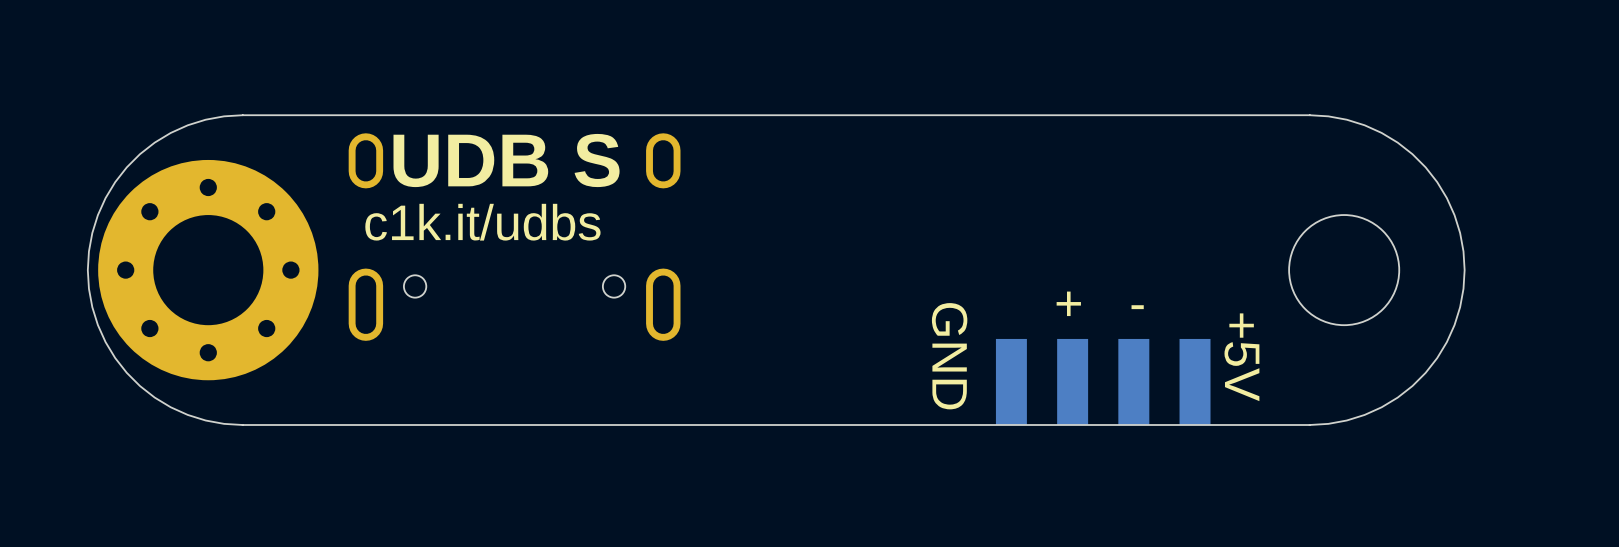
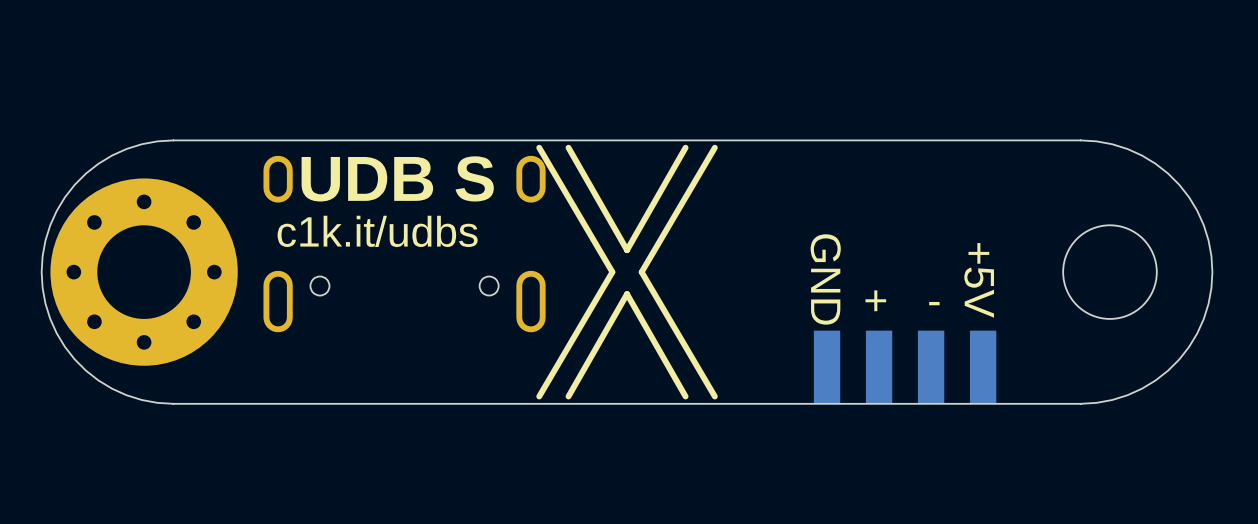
line: none -> (539, 147) (612, 272) (539, 396)
line: none -> (685, 147) (627, 250) (568, 147)
line: none -> (714, 147) (641, 272) (714, 396)
text position: GND (949, 356) -> GND (825, 279)
text position: +5V (1241, 357) -> +5V (979, 280)
line: none -> (685, 396) (627, 294) (568, 396)

